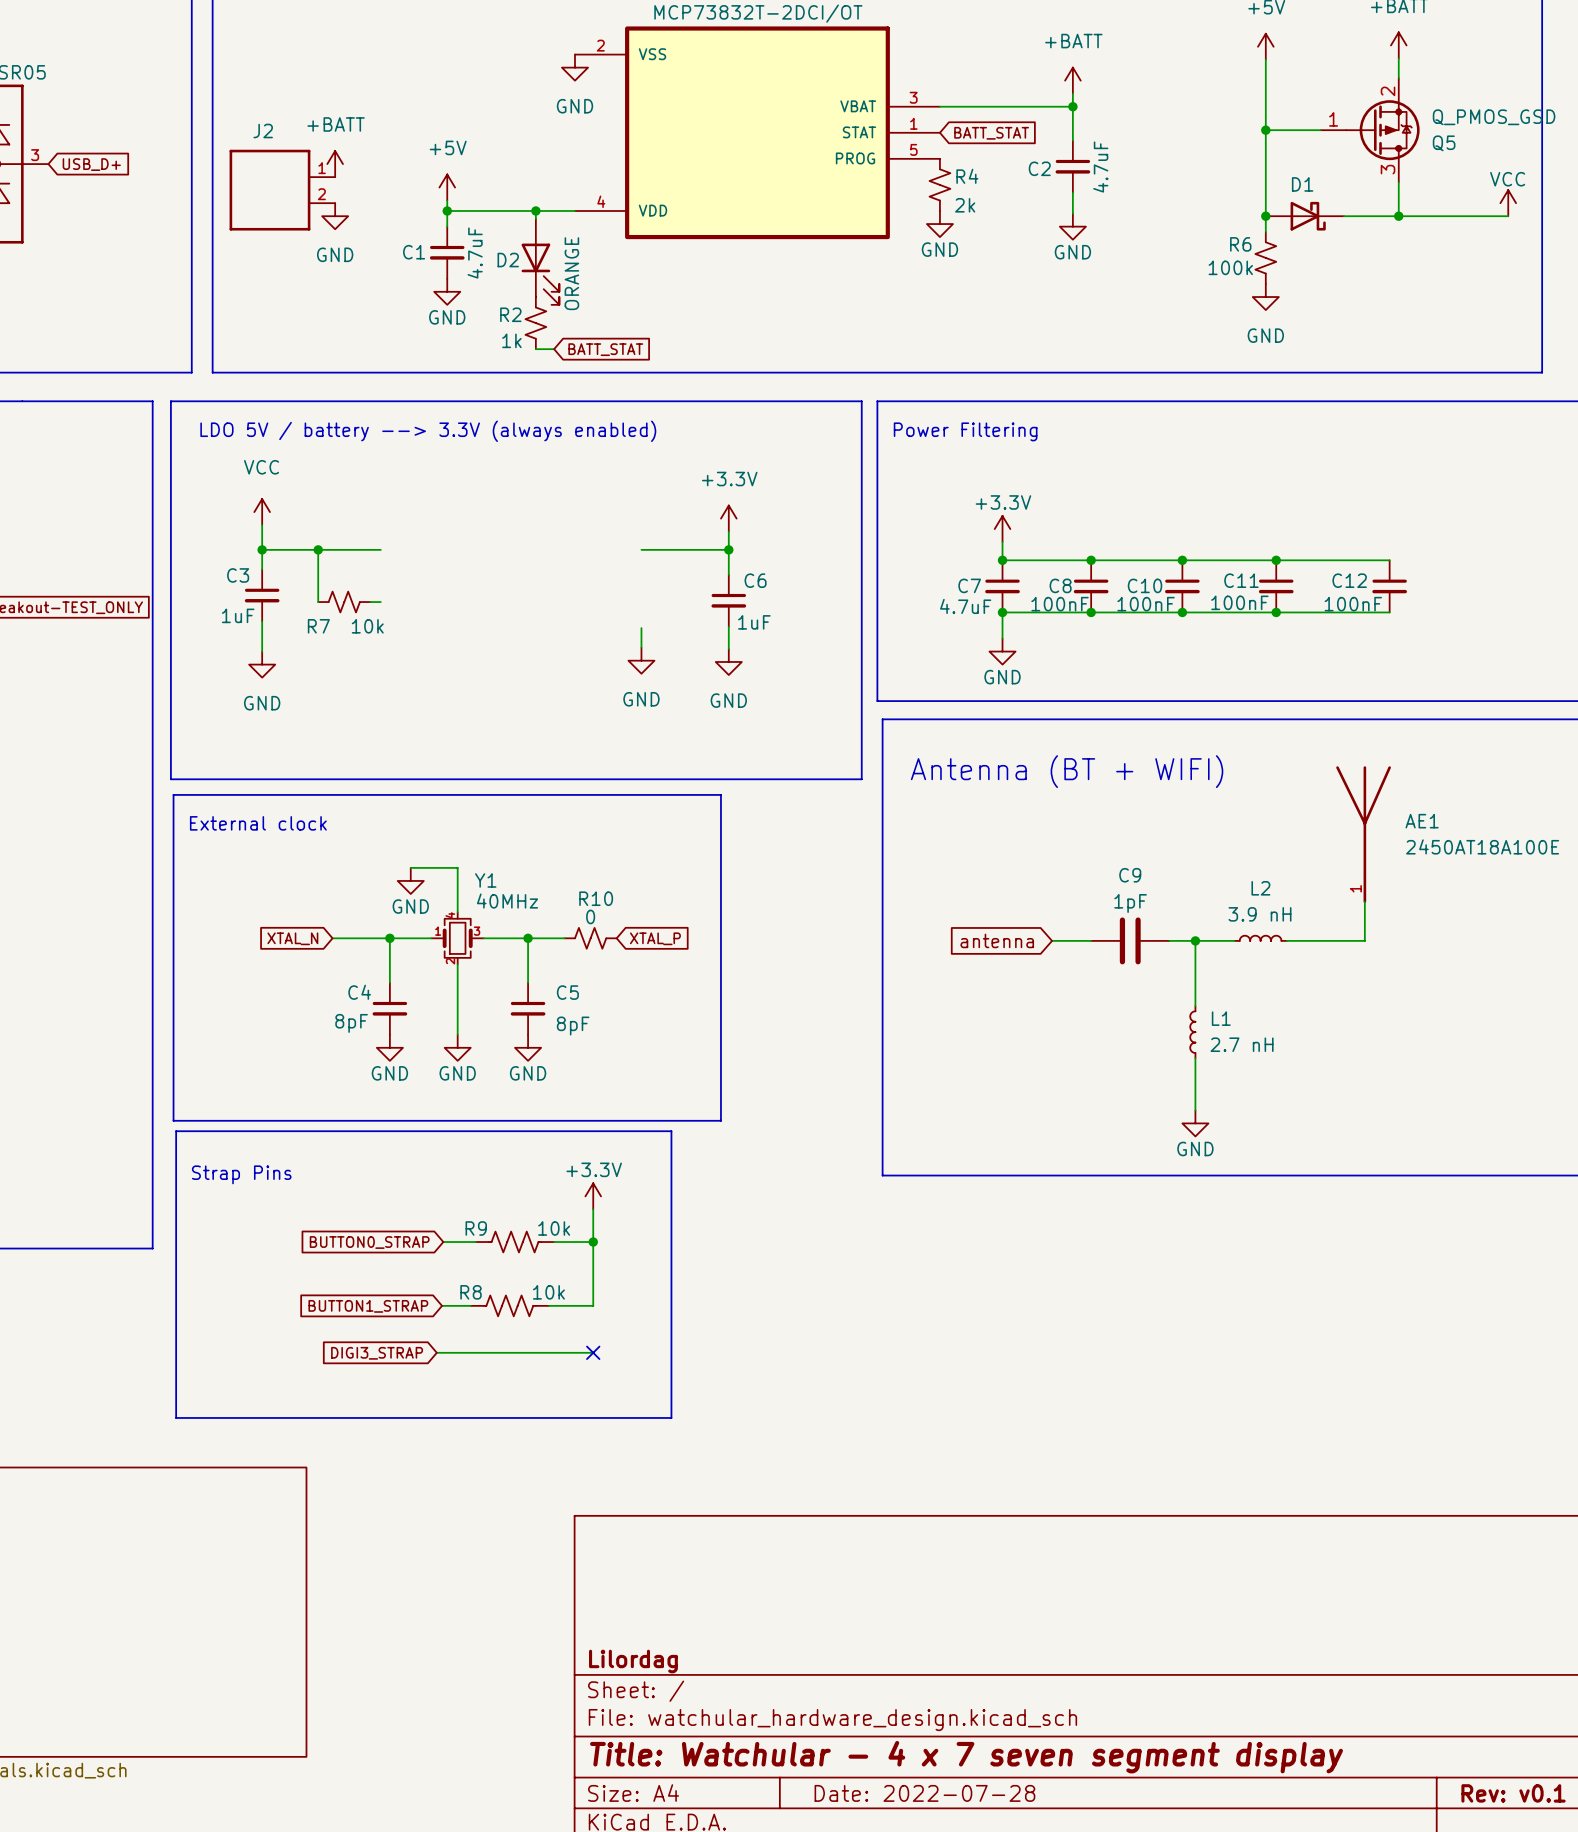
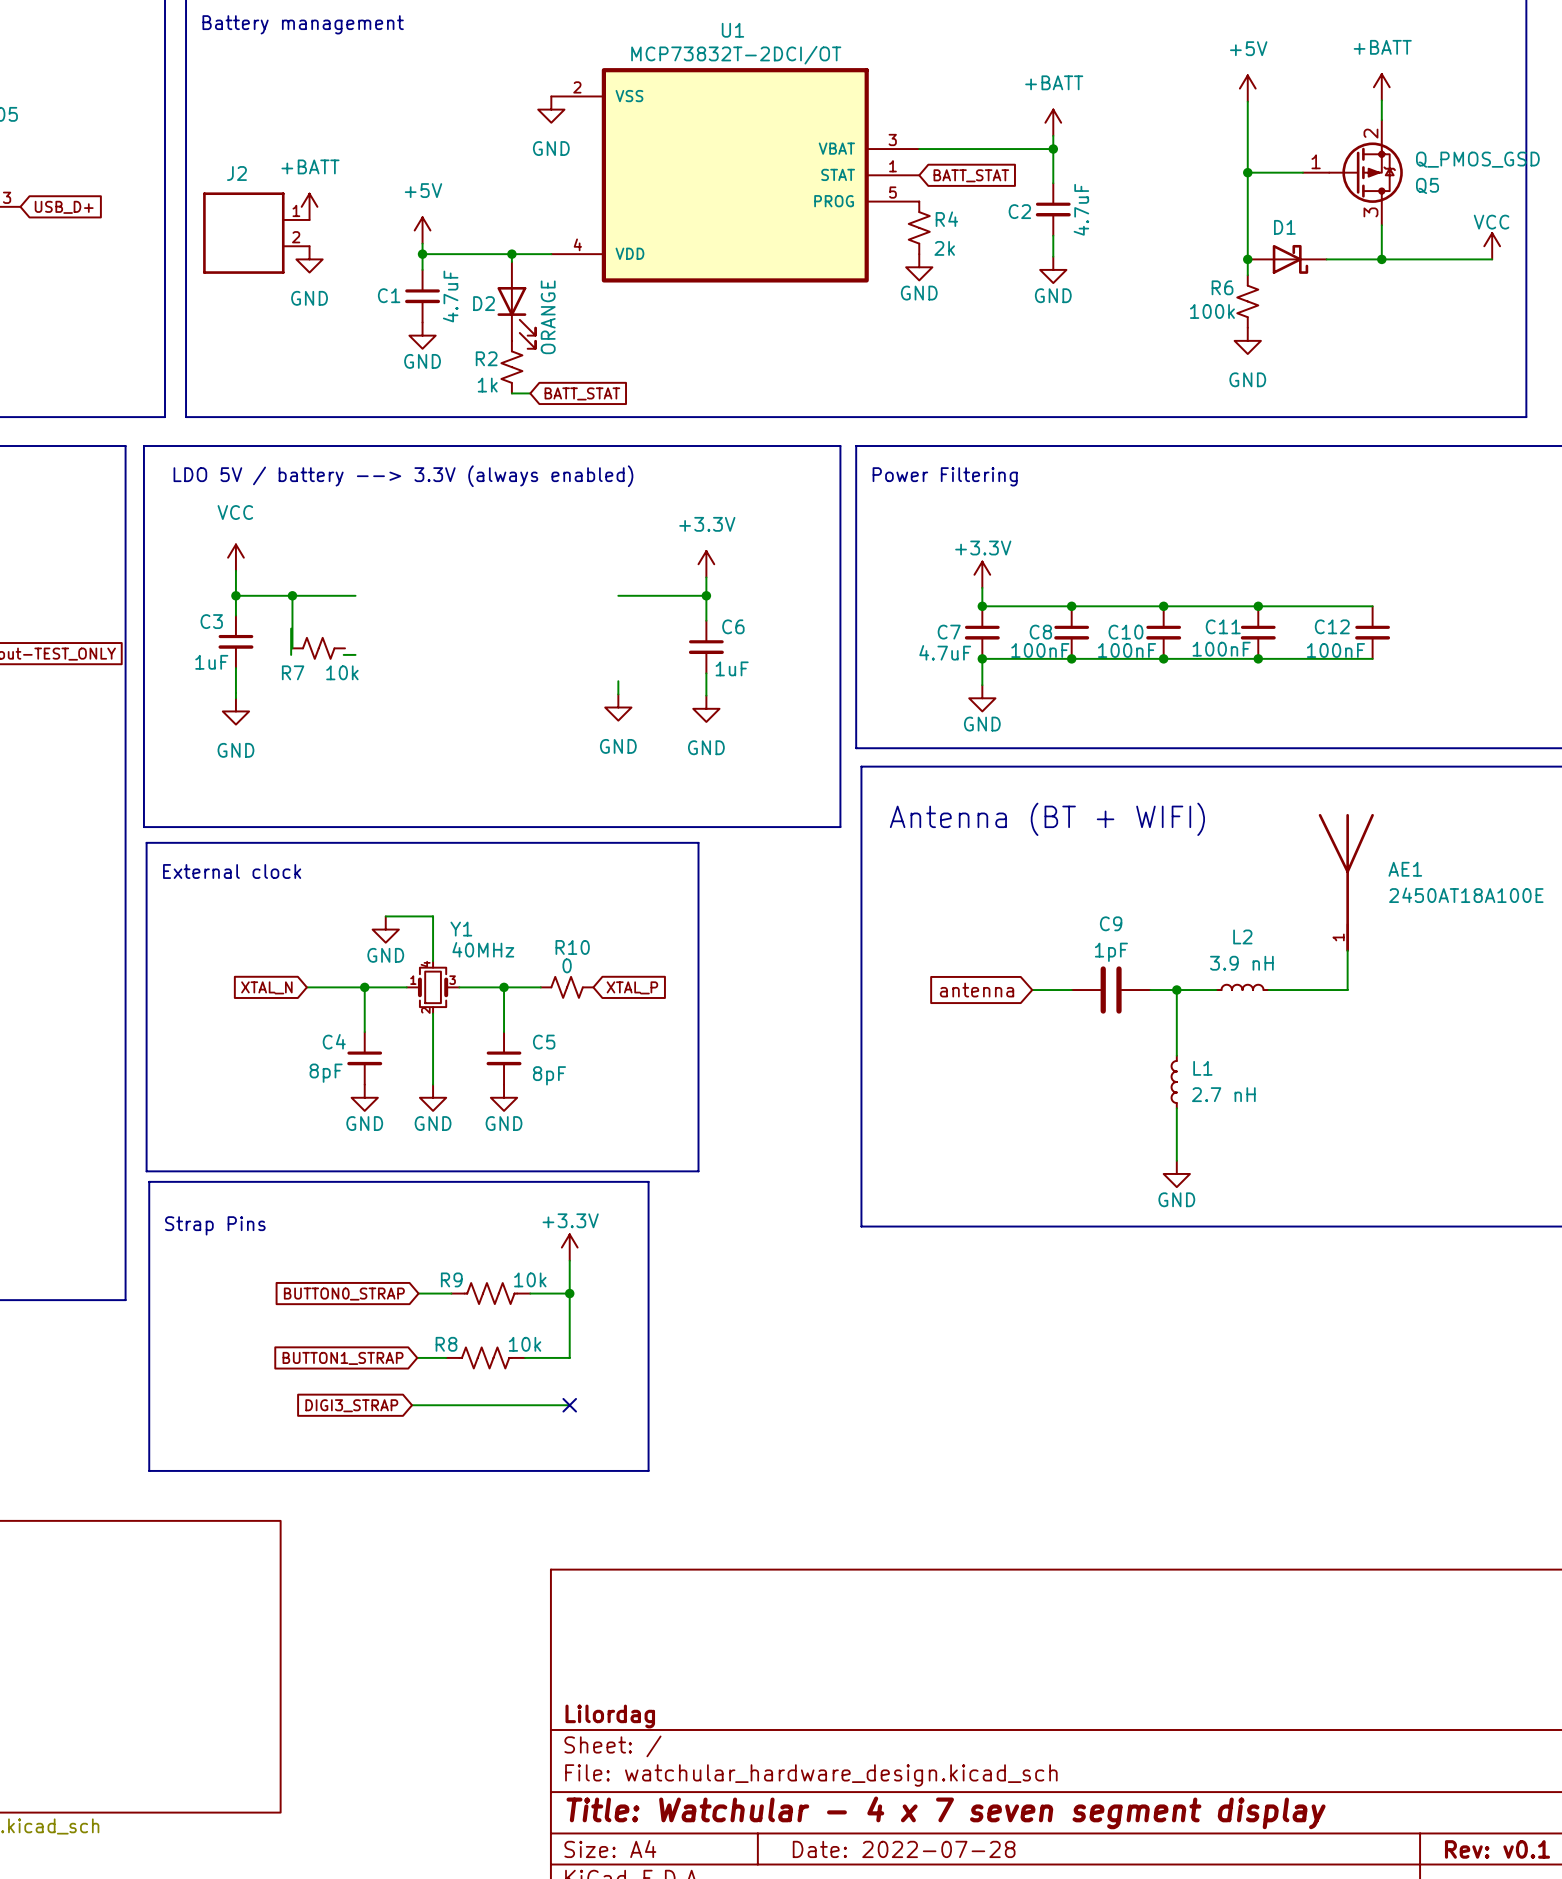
wire: none -> (291, 628) (291, 654)
wire: (370, 602) (380, 602) -> none
wire: none -> (343, 654) (355, 654)
wire: (641, 628) (641, 634) -> none

